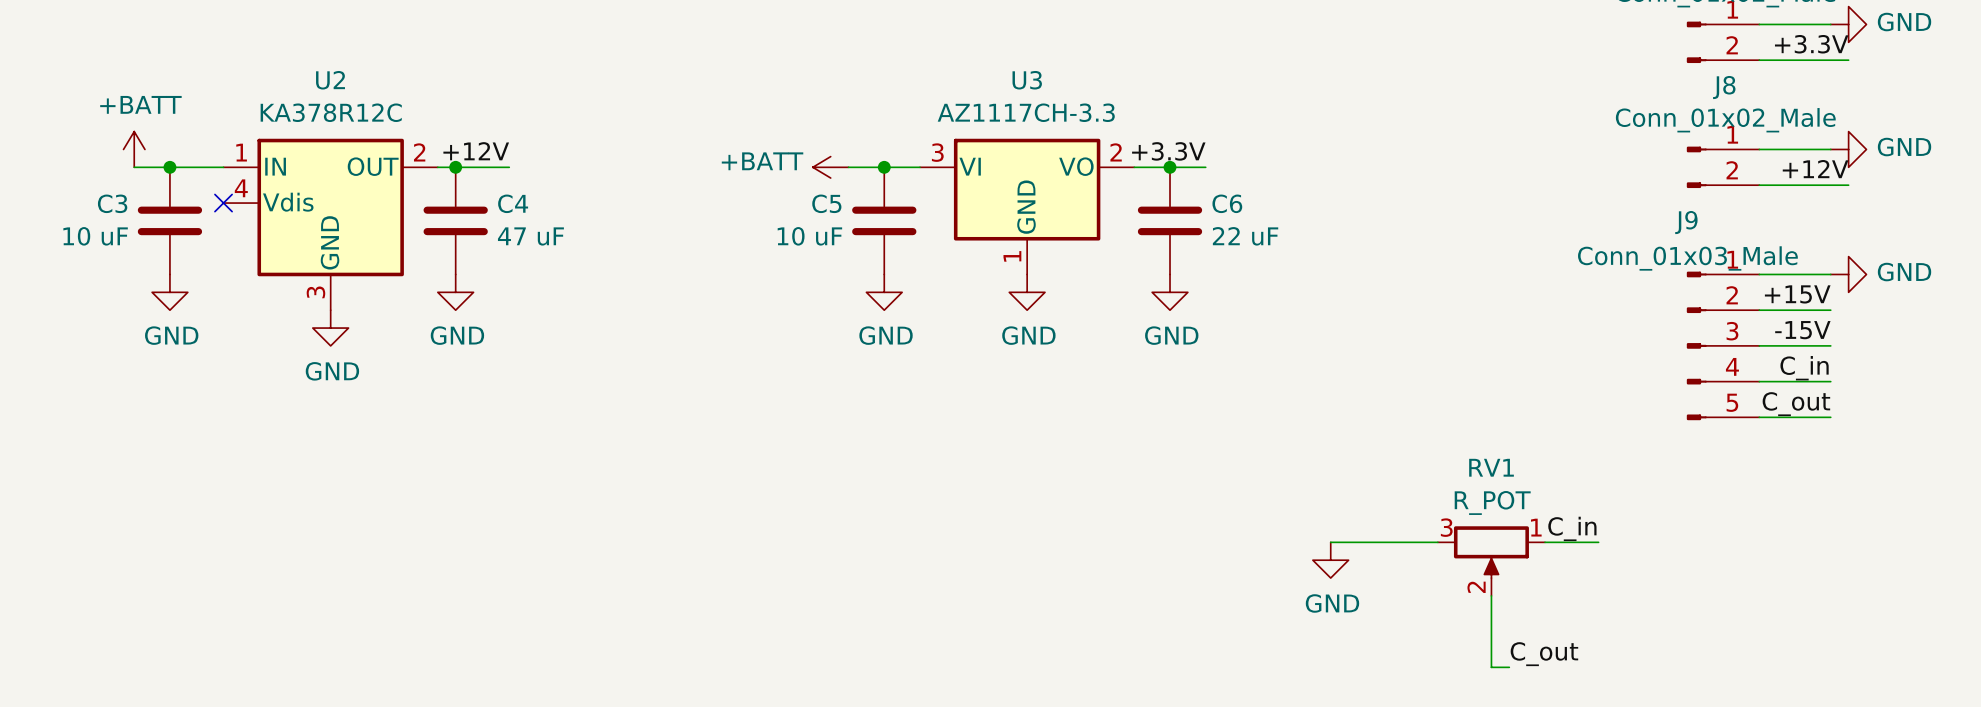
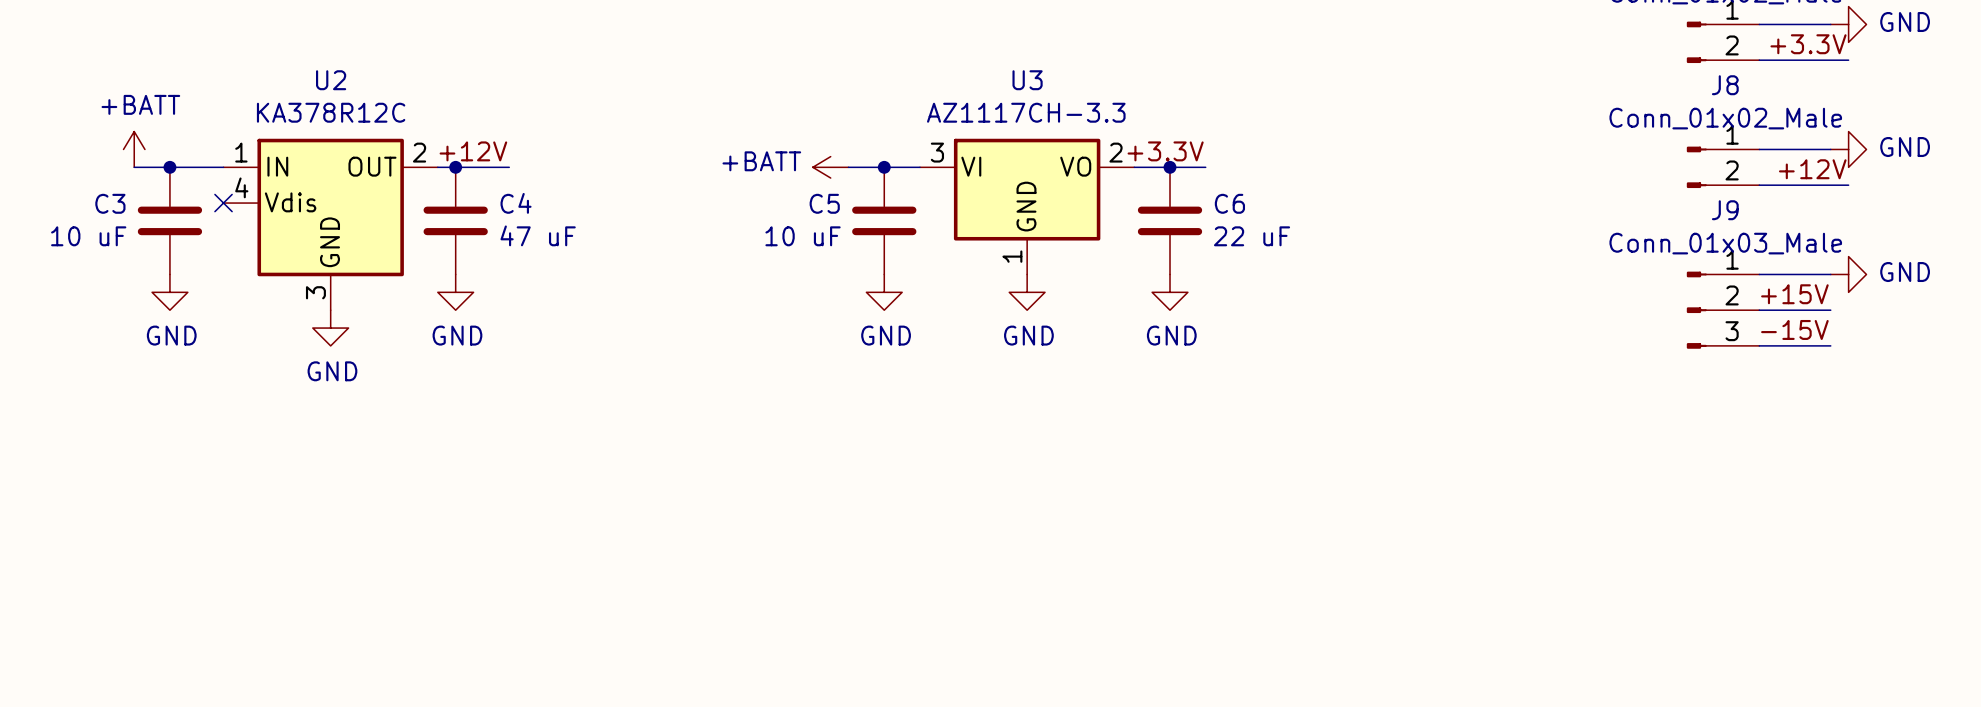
J9 name position: J9 (1686, 222) -> J9 (1725, 210)
J9 value position: Conn_01x03_Male (1687, 258) -> Conn_01x03_Male (1725, 243)
J9 symbol: [1686, 271, 1760, 421] -> [1686, 271, 1760, 349]
label: C_in (1804, 368) -> none
wire: (1759, 381) (1830, 381) -> none
label: C_out (1796, 404) -> none
wire: (1759, 417) (1830, 417) -> none
label: C_in (1572, 528) -> none
wire: (1330, 542) (1437, 542) -> none
wire: (1545, 542) (1598, 542) -> none
power symbol: GND (1330, 560) -> none
RV1: R_POT (1491, 561) -> none
wire: (1491, 595) (1491, 667) (1509, 667) -> none
label: C_out (1544, 654) -> none

